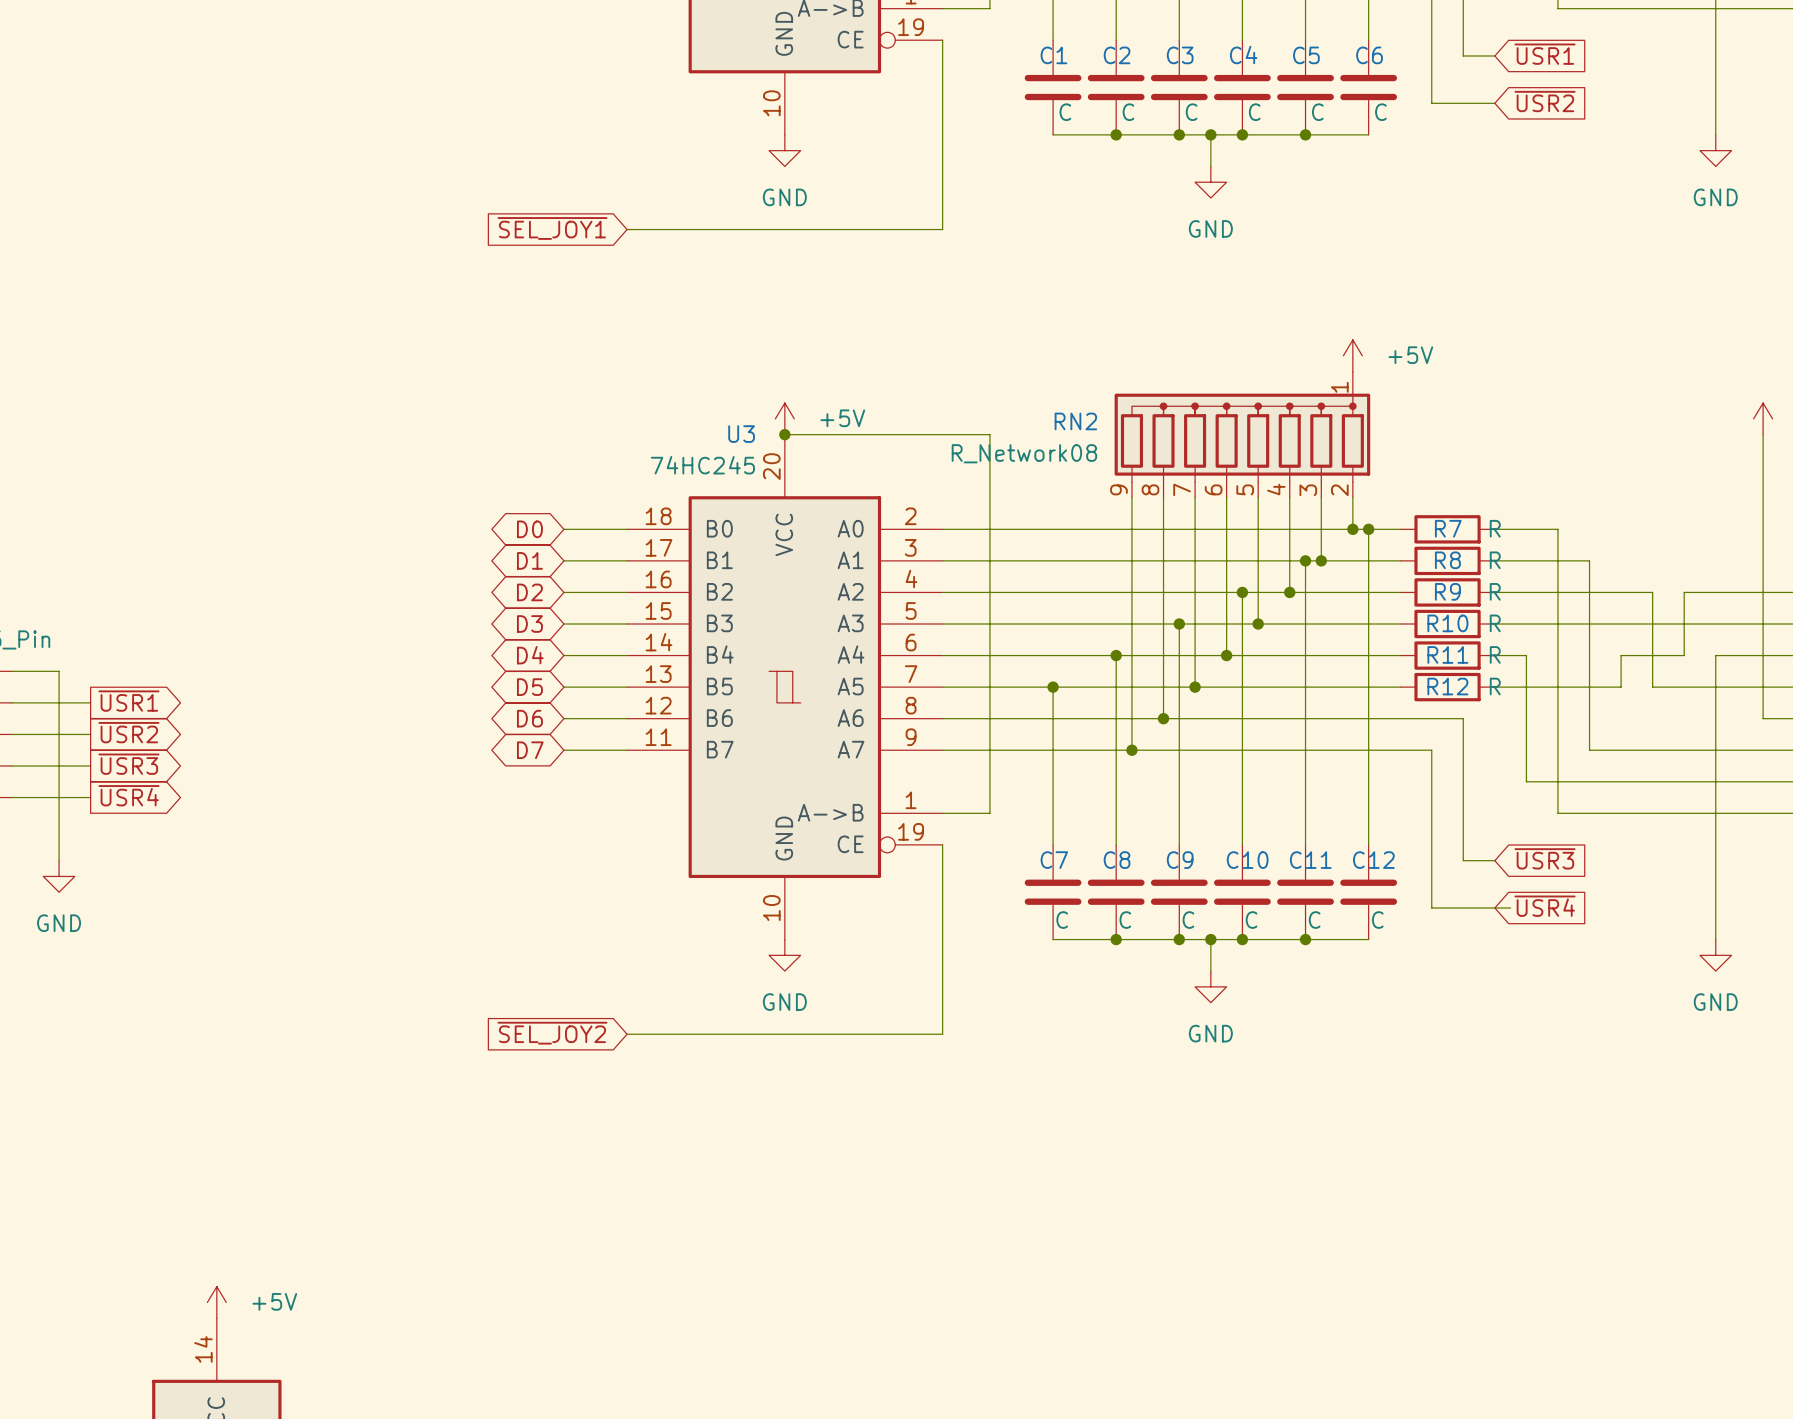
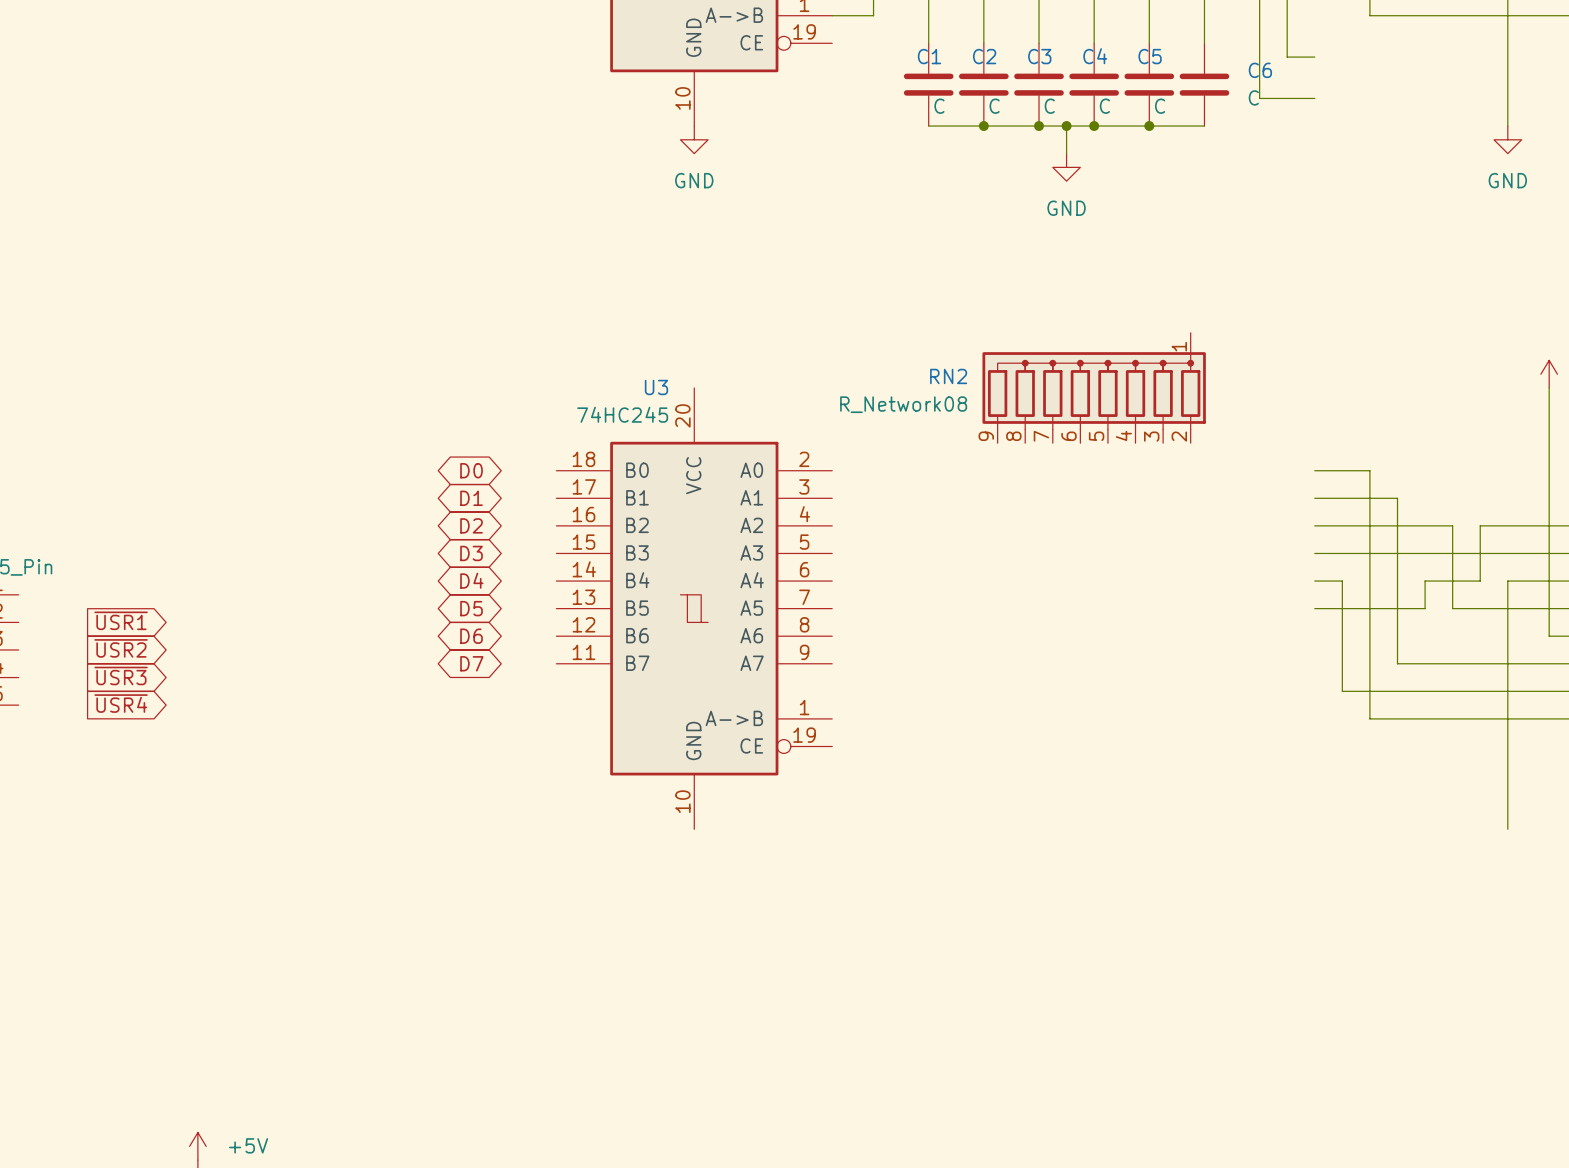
wire: (942, 40) (942, 229) (627, 229) -> none
global label: ~{USR1} (1545, 54) -> none
C6 name position: C6 (1369, 55) -> C6 (1260, 70)
global label: ~{USR2} (1545, 101) -> none
C6 value position: C (1380, 112) -> C (1253, 97)
global label: ~{SEL_JOY1} (552, 228) -> none
power symbol: +5V (1352, 355) -> none
power symbol: +5V (784, 418) -> none
wire: (784, 434) (989, 434) (989, 813) (942, 813) -> none
junction: (784, 434) -> none
wire: (1131, 497) (1131, 750) -> none
wire: (1163, 497) (1163, 718) -> none
wire: (1195, 497) (1195, 687) -> none
wire: (1226, 497) (1226, 655) -> none
wire: (1258, 497) (1258, 624) -> none
wire: (1289, 497) (1289, 592) -> none
wire: (1321, 497) (1321, 560) -> none
wire: (1352, 497) (1352, 529) -> none
wire: (563, 529) (627, 529) -> none
wire: (942, 529) (1400, 529) -> none
junction: (1352, 529) -> none
wire: (1368, 529) (1368, 844) -> none
junction: (1368, 529) -> none
R7: R (1447, 529) -> none
wire: (563, 560) (627, 560) -> none
wire: (942, 560) (1400, 560) -> none
wire: (1305, 560) (1305, 844) -> none
junction: (1305, 560) -> none
junction: (1321, 560) -> none
R8: R (1447, 560) -> none
wire: (563, 592) (627, 592) -> none
wire: (942, 592) (1400, 592) -> none
wire: (1242, 592) (1242, 844) -> none
junction: (1242, 592) -> none
junction: (1289, 592) -> none
R9: R (1447, 592) -> none
wire: (563, 624) (627, 624) -> none
wire: (942, 624) (1400, 624) -> none
wire: (1179, 624) (1179, 844) -> none
junction: (1179, 624) -> none
junction: (1258, 624) -> none
R10: R (1447, 624) -> none
wire: (563, 655) (627, 655) -> none
wire: (942, 655) (1400, 655) -> none
wire: (1116, 655) (1116, 844) -> none
junction: (1116, 655) -> none
junction: (1226, 655) -> none
R11: R (1447, 655) -> none
wire: (11, 671) (59, 671) (59, 860) -> none
wire: (563, 687) (627, 687) -> none
wire: (942, 687) (1400, 687) -> none
wire: (1053, 687) (1053, 844) -> none
junction: (1053, 687) -> none
junction: (1195, 687) -> none
R12: R (1447, 687) -> none
wire: (11, 702) (90, 702) -> none
wire: (563, 718) (627, 718) -> none
wire: (942, 718) (1463, 718) (1463, 860) (1494, 860) -> none
junction: (1163, 718) -> none
wire: (11, 734) (90, 734) -> none
wire: (563, 750) (627, 750) -> none
wire: (942, 750) (1431, 750) (1431, 908) (1510, 908) -> none
junction: (1131, 750) -> none
wire: (11, 766) (90, 766) -> none
wire: (11, 797) (90, 797) -> none
wire: (942, 844) (942, 1034) (627, 1034) -> none
global label: ~{USR3} (1545, 858) -> none
power symbol: GND (59, 876) -> none
C7: C (1053, 892) -> none
C8: C (1116, 892) -> none
C9: C (1179, 892) -> none
C10: C (1242, 892) -> none
C11: C (1305, 892) -> none
C12: C (1368, 892) -> none
global label: ~{USR4} (1545, 906) -> none
wire: (1053, 939) (1368, 939) -> none
junction: (1116, 939) -> none
junction: (1179, 939) -> none
wire: (1210, 939) (1210, 971) -> none
junction: (1210, 939) -> none
junction: (1242, 939) -> none
junction: (1305, 939) -> none
power symbol: GND (784, 955) -> none
power symbol: GND (1715, 955) -> none
power symbol: GND (1210, 986) -> none
global label: ~{SEL_JOY2} (552, 1033) -> none

